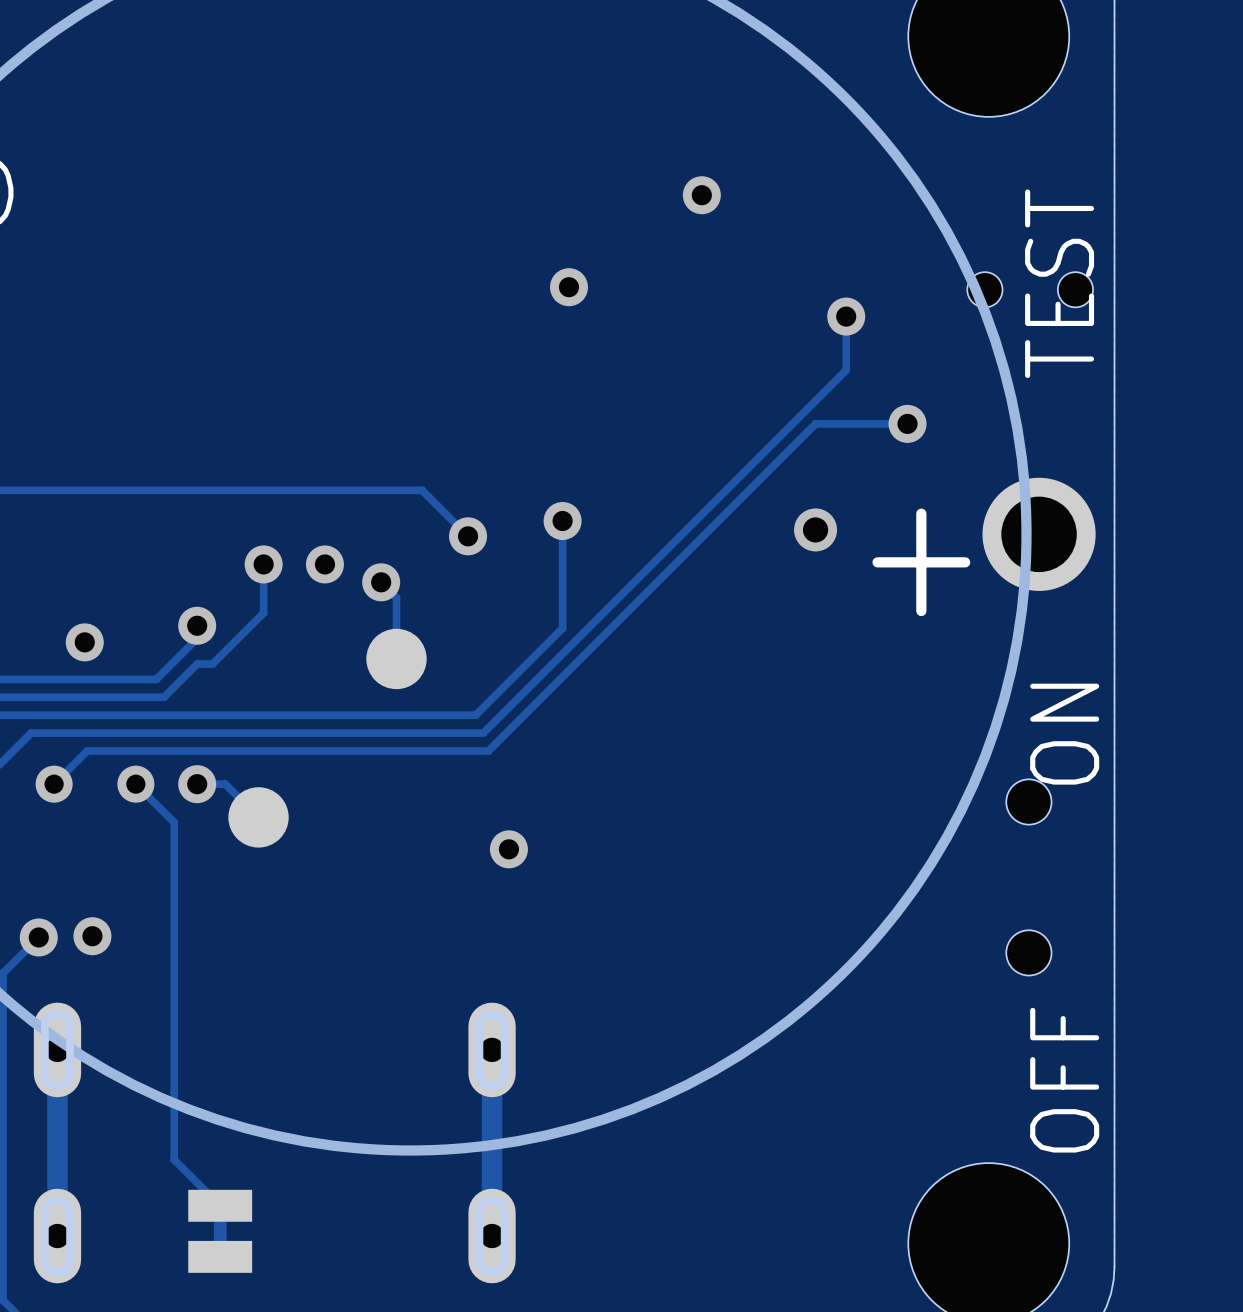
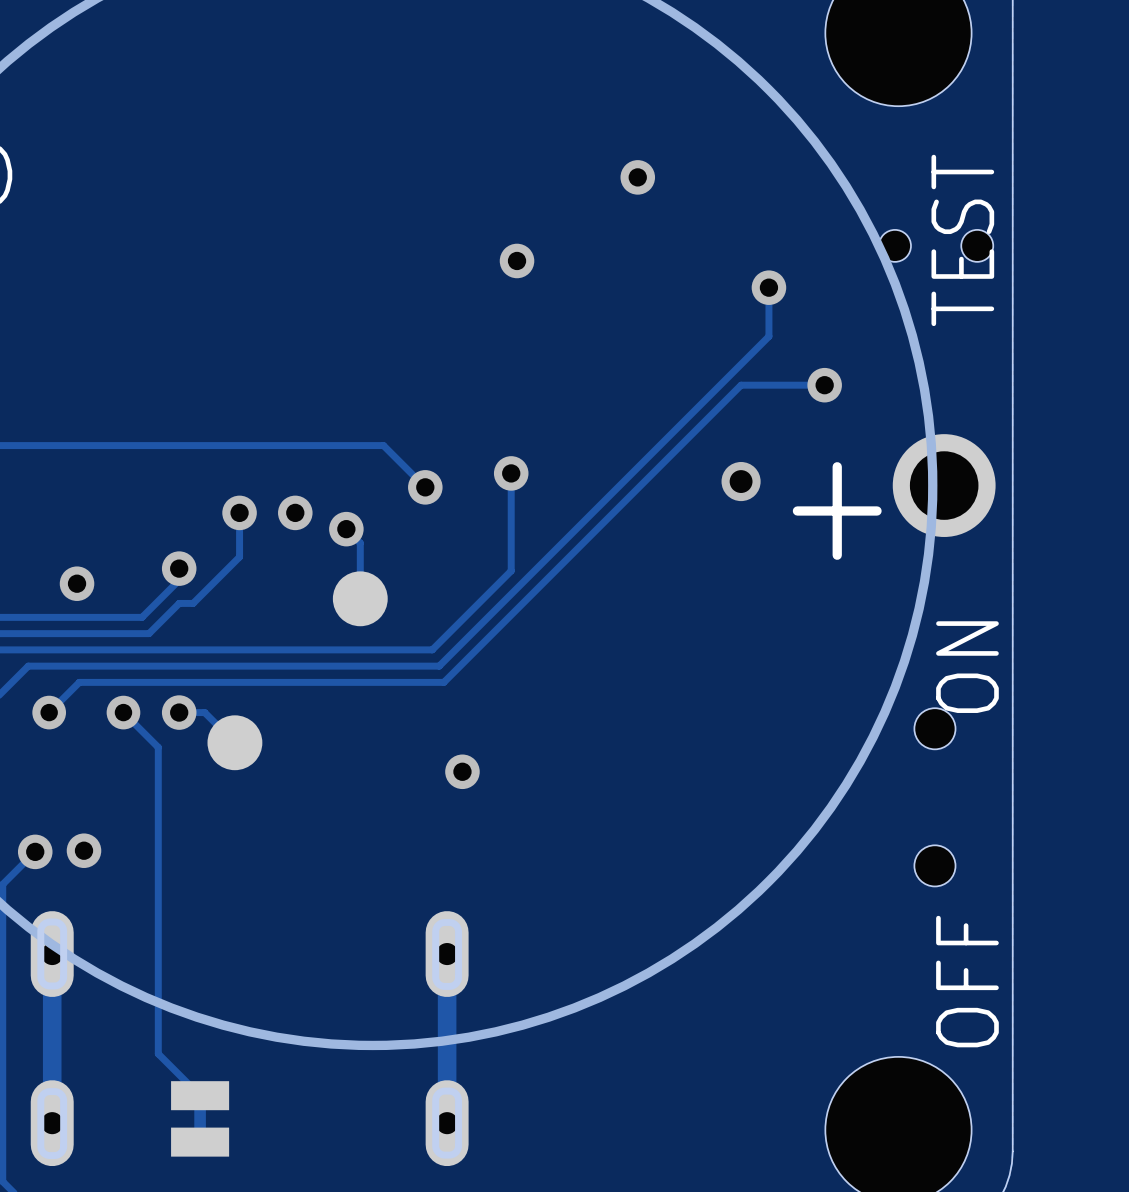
text position: TEST (1059, 283) -> TEST (962, 240)
part position: (1030, 289) -> (936, 245)

